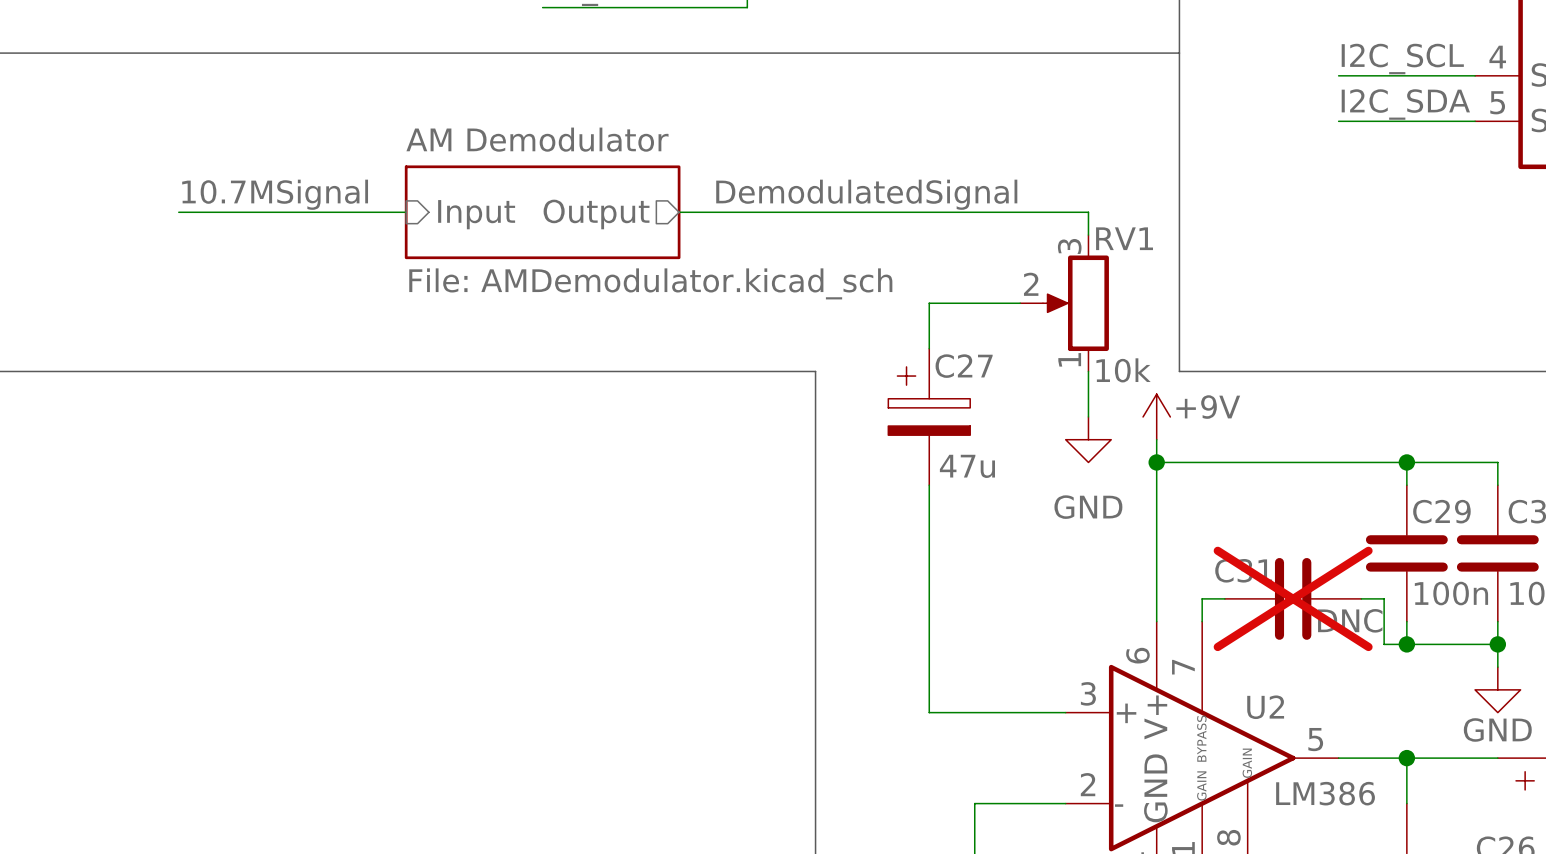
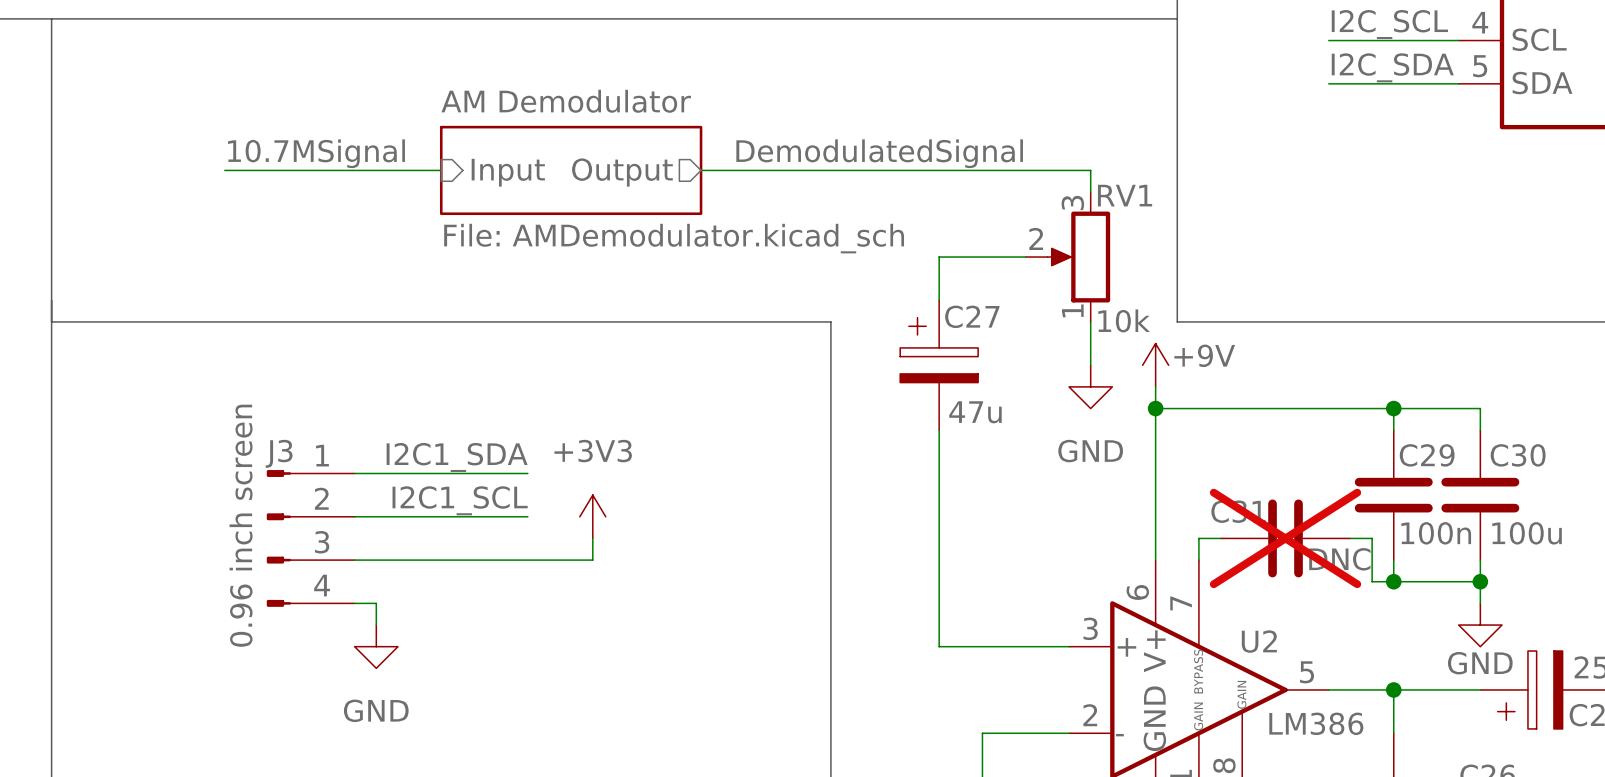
label: none -> I2C1_SDA (457, 457)
wire: none -> (354, 473) (527, 473)
label: none -> I2C1_SCL (460, 500)
wire: none -> (354, 516) (527, 516)
power symbol: none -> +3V3 (592, 516)
J3: none -> 0.96 inch screen (310, 538)
wire: none -> (592, 538) (592, 560) (354, 560)
wire: none -> (354, 603) (376, 603) (376, 625)
power symbol: none -> GND (376, 646)

